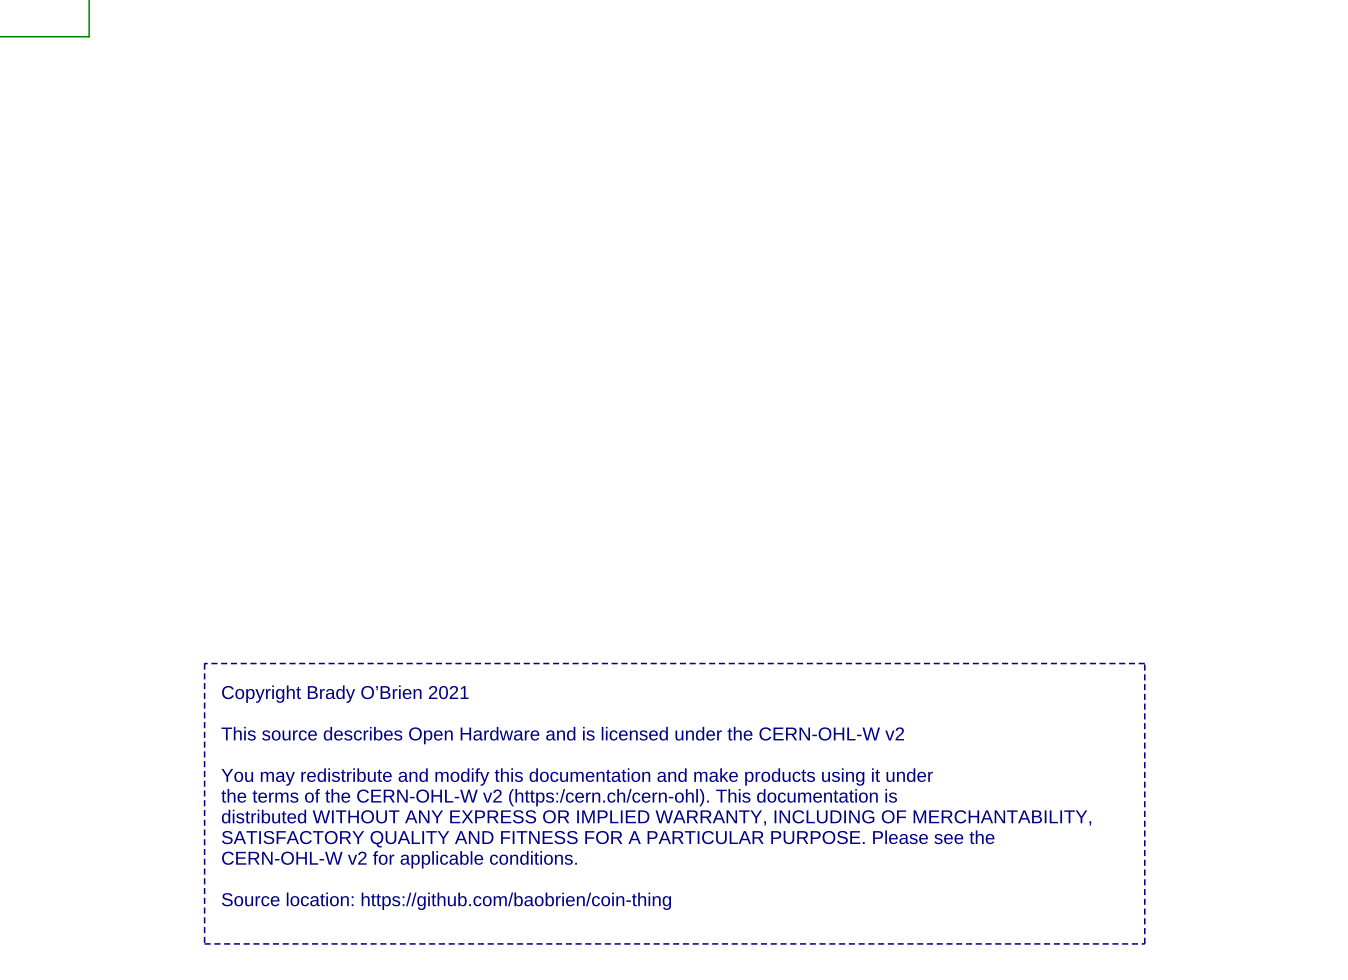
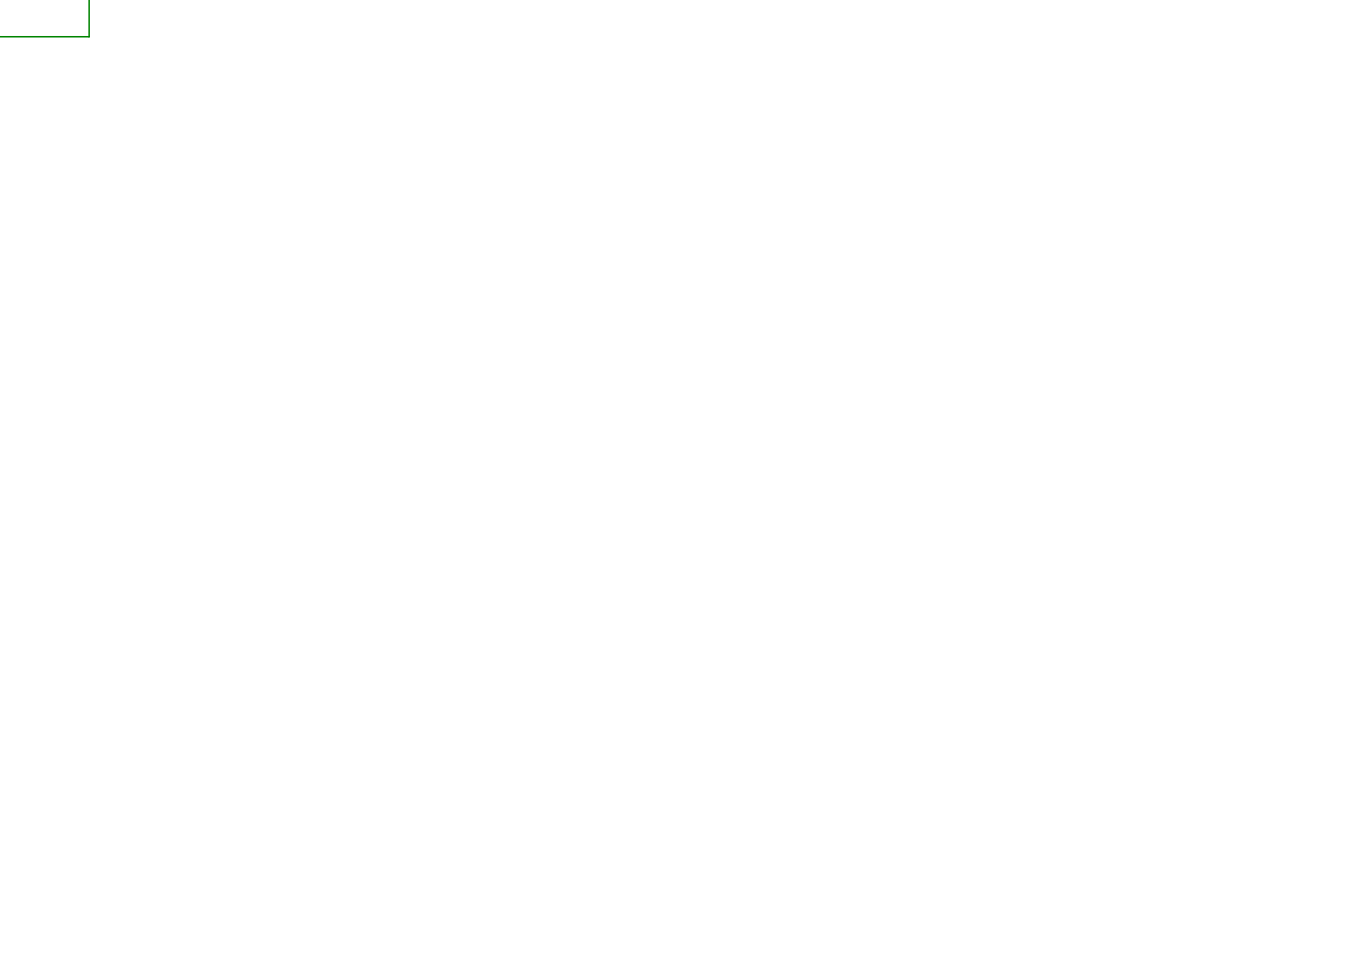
line: (204, 663) (204, 943) (1144, 943) (1144, 663) (204, 663) -> none
text: Copyright Brady O’Brien 2021 (345, 694) -> none
text: This source describes Open Hardware and is licensed under the CERN-OHL-W v2 (562, 735) -> none
text: You may redistribute and modify this documentation and make products using it under (577, 777) -> none
text: the terms of the CERN-OHL-W v2 (https:/cern.ch/cern-ohl). This documentation is (559, 797) -> none
text: distributed WITHOUT ANY EXPRESS OR IMPLIED WARRANTY, INCLUDING OF MERCHANTABILITY, (656, 817) -> none
text: SATISFACTORY QUALITY AND FITNESS FOR A PARTICULAR PURPOSE. Please see the (608, 838) -> none
text: CERN-OHL-W v2 for applicable conditions. (399, 859) -> none
text: Source location: https://github.com/baobrien/coin-thing (446, 901) -> none

